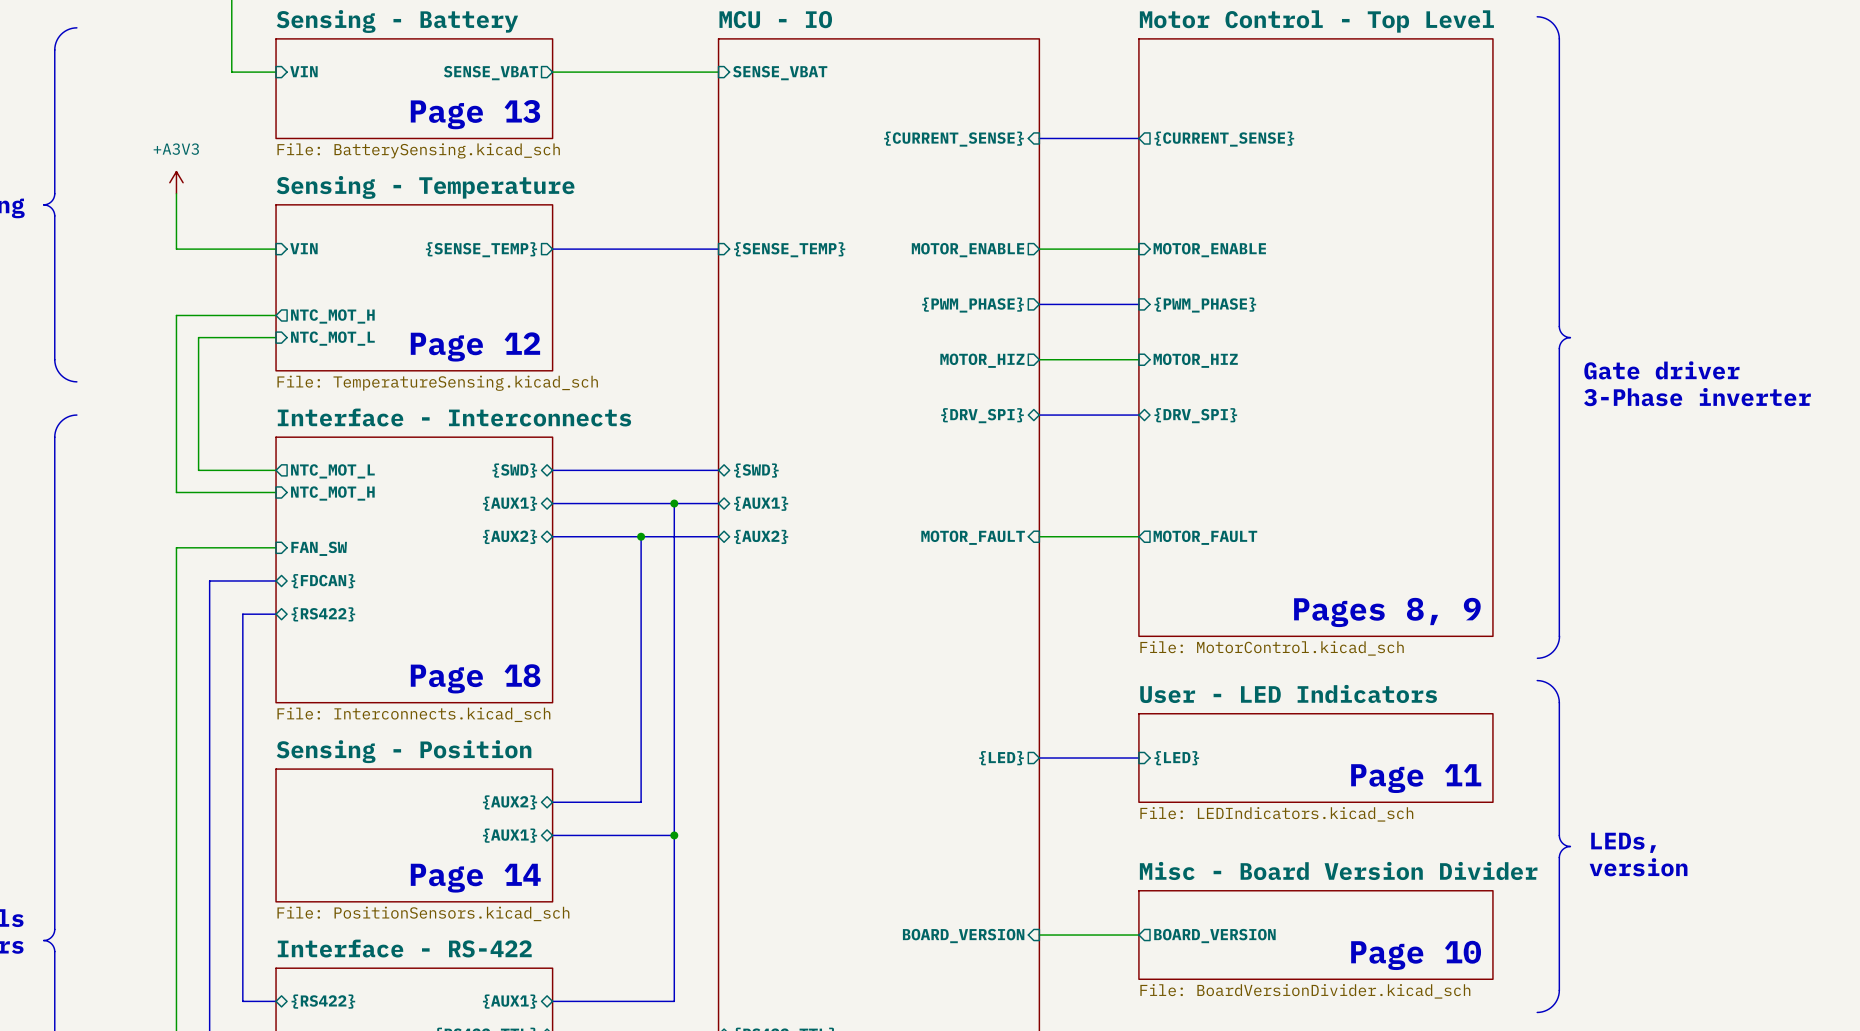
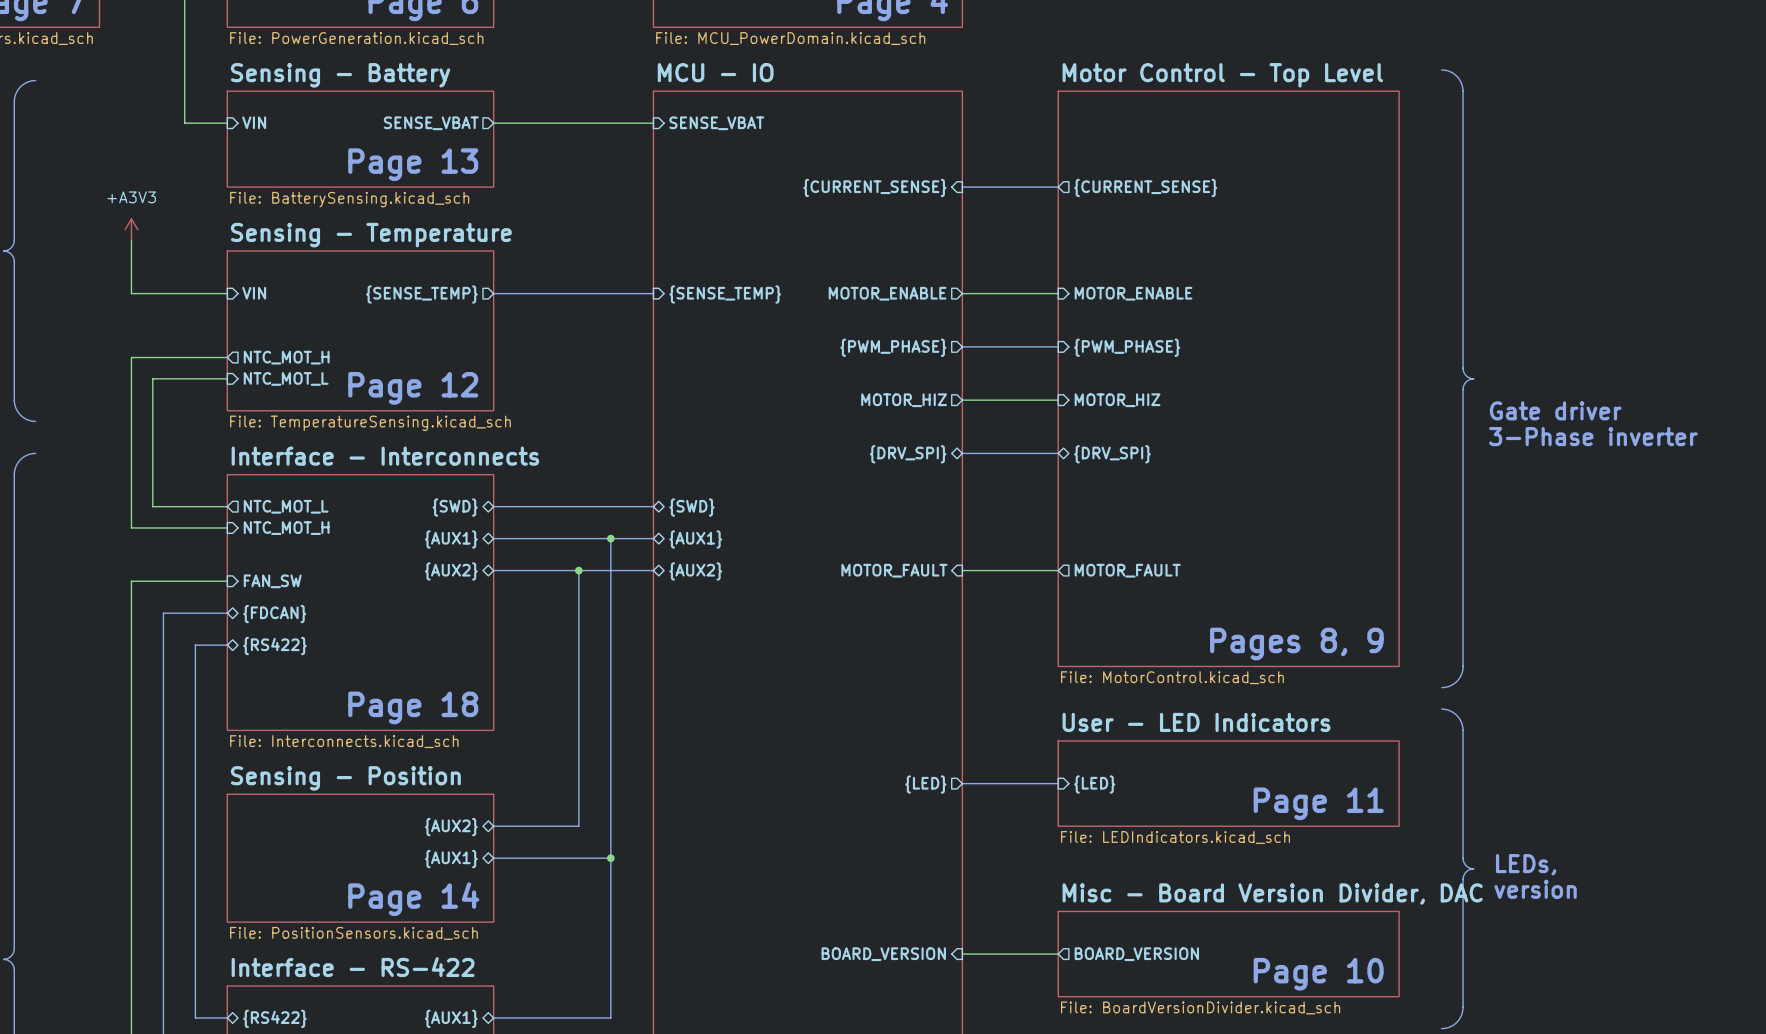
sheet Misc - Board Version Divider name: Misc - Board Version Divider (1338, 870) -> Misc - Board Version Divider, DAC (1272, 894)

